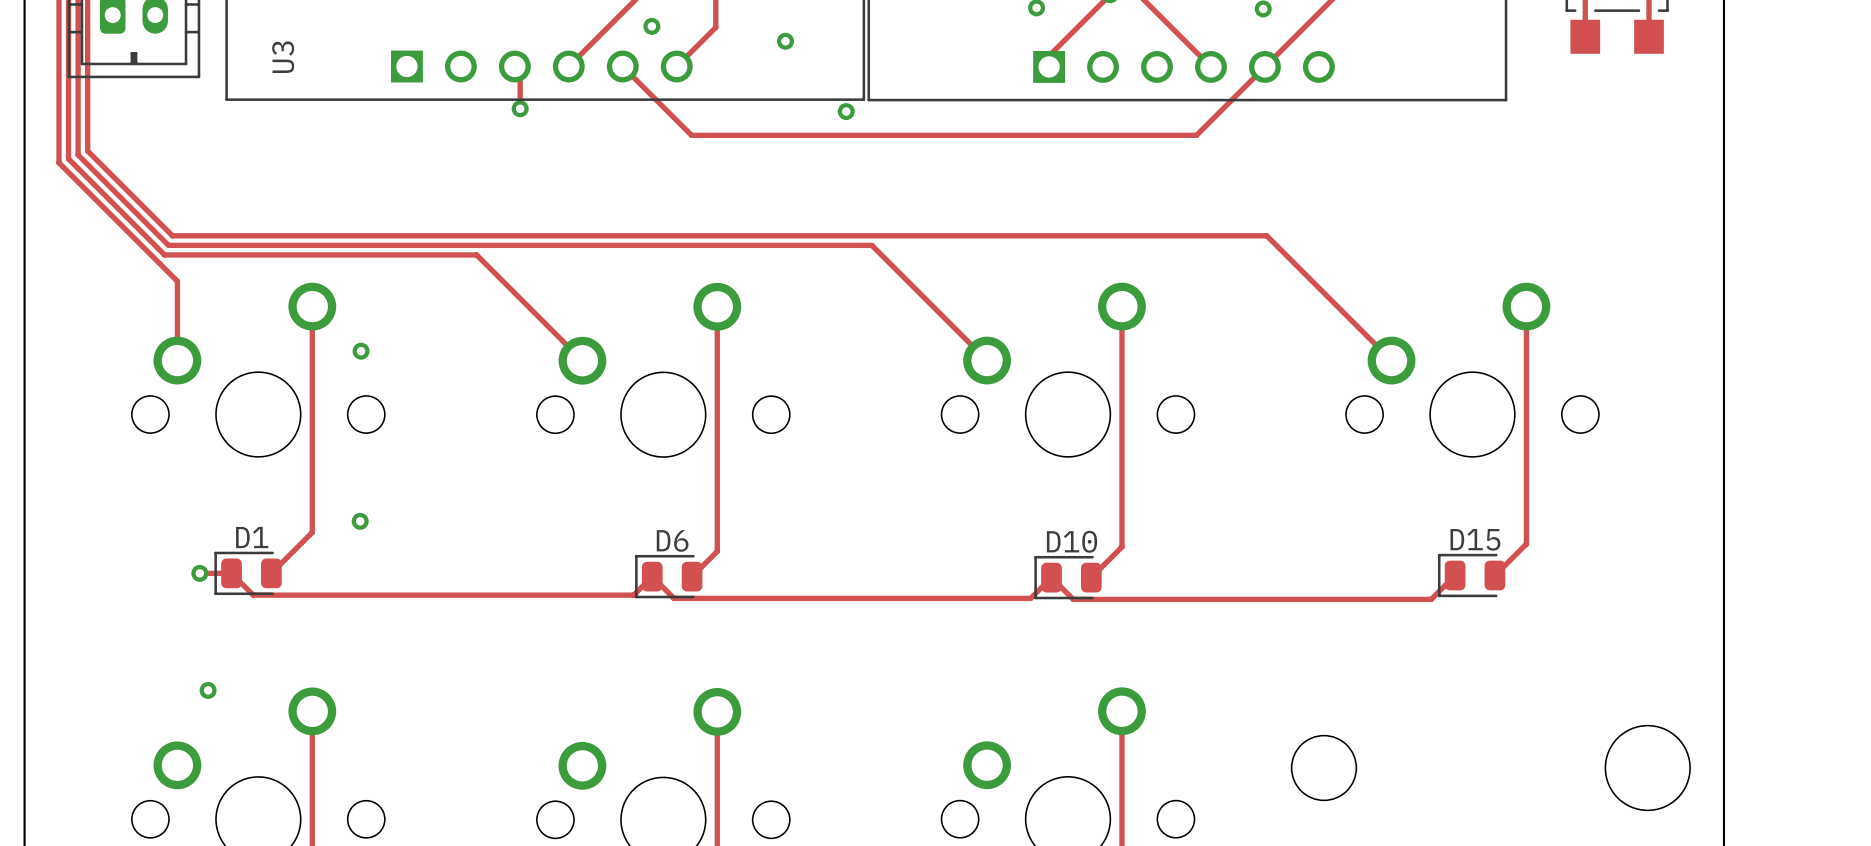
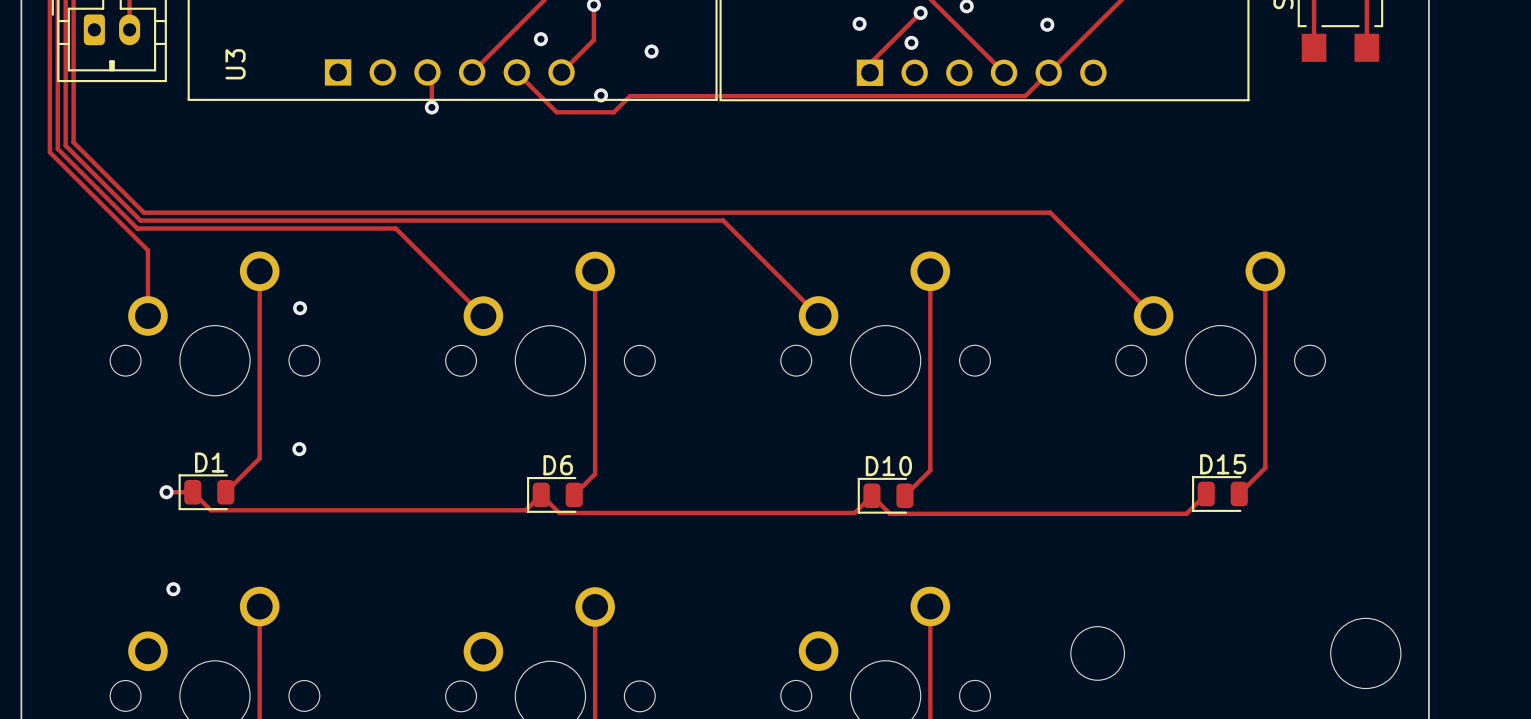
via: none -> (911, 42)
track: (1236, 95) (1196, 135) (691, 135) (670, 114) -> (1025, 96) (630, 96) (613, 112) (556, 112)
via position: (846, 111) -> (601, 95)

